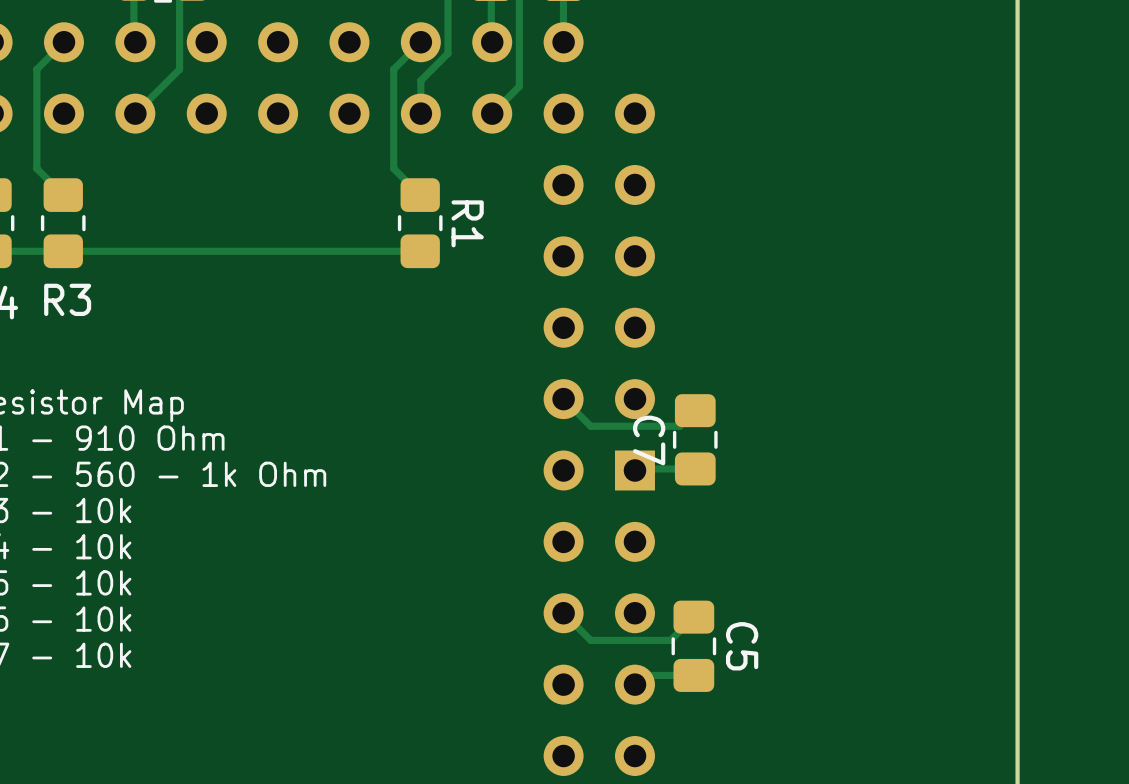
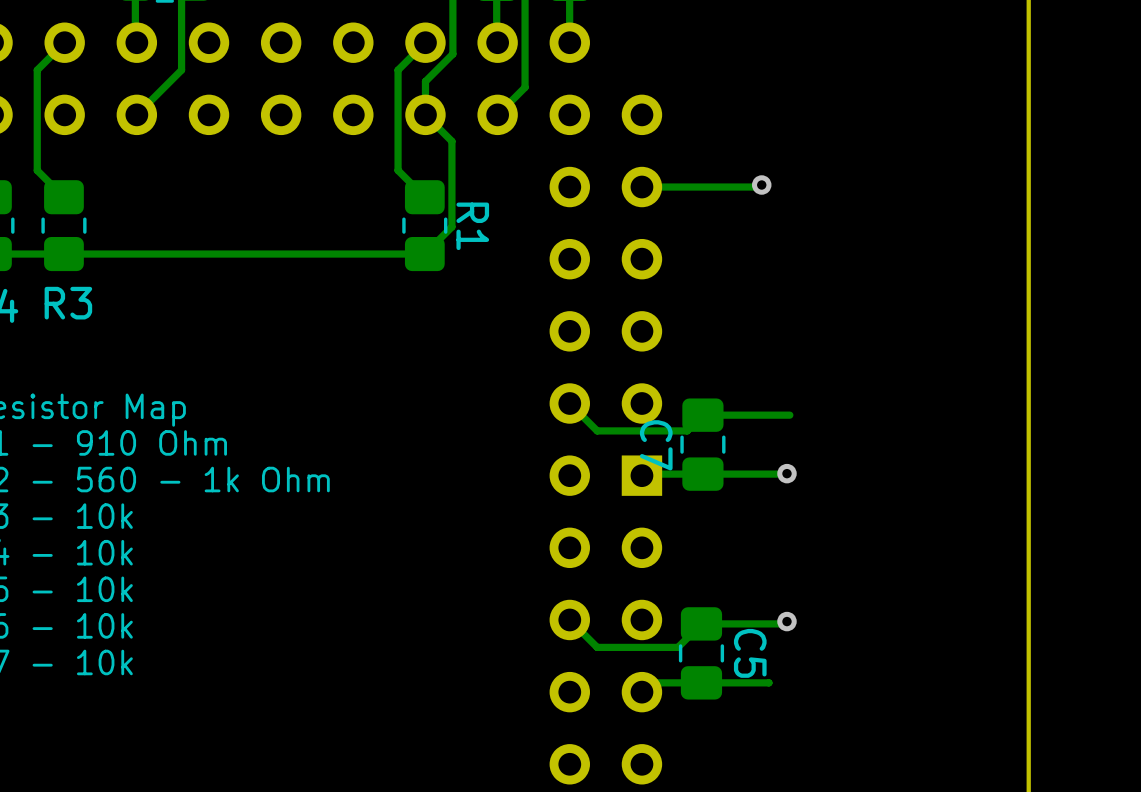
track: none -> (425, 114) (451, 141) (451, 226) (424, 254)
track: none -> (761, 185) (759, 187) (641, 187)
via: none -> (761, 185)
track: none -> (789, 415) (702, 415)
track: none -> (786, 473) (702, 474)
via: none -> (786, 473)
track: none -> (786, 621) (784, 623) (701, 623)
via: none -> (786, 621)
track: none -> (768, 682) (701, 682)

